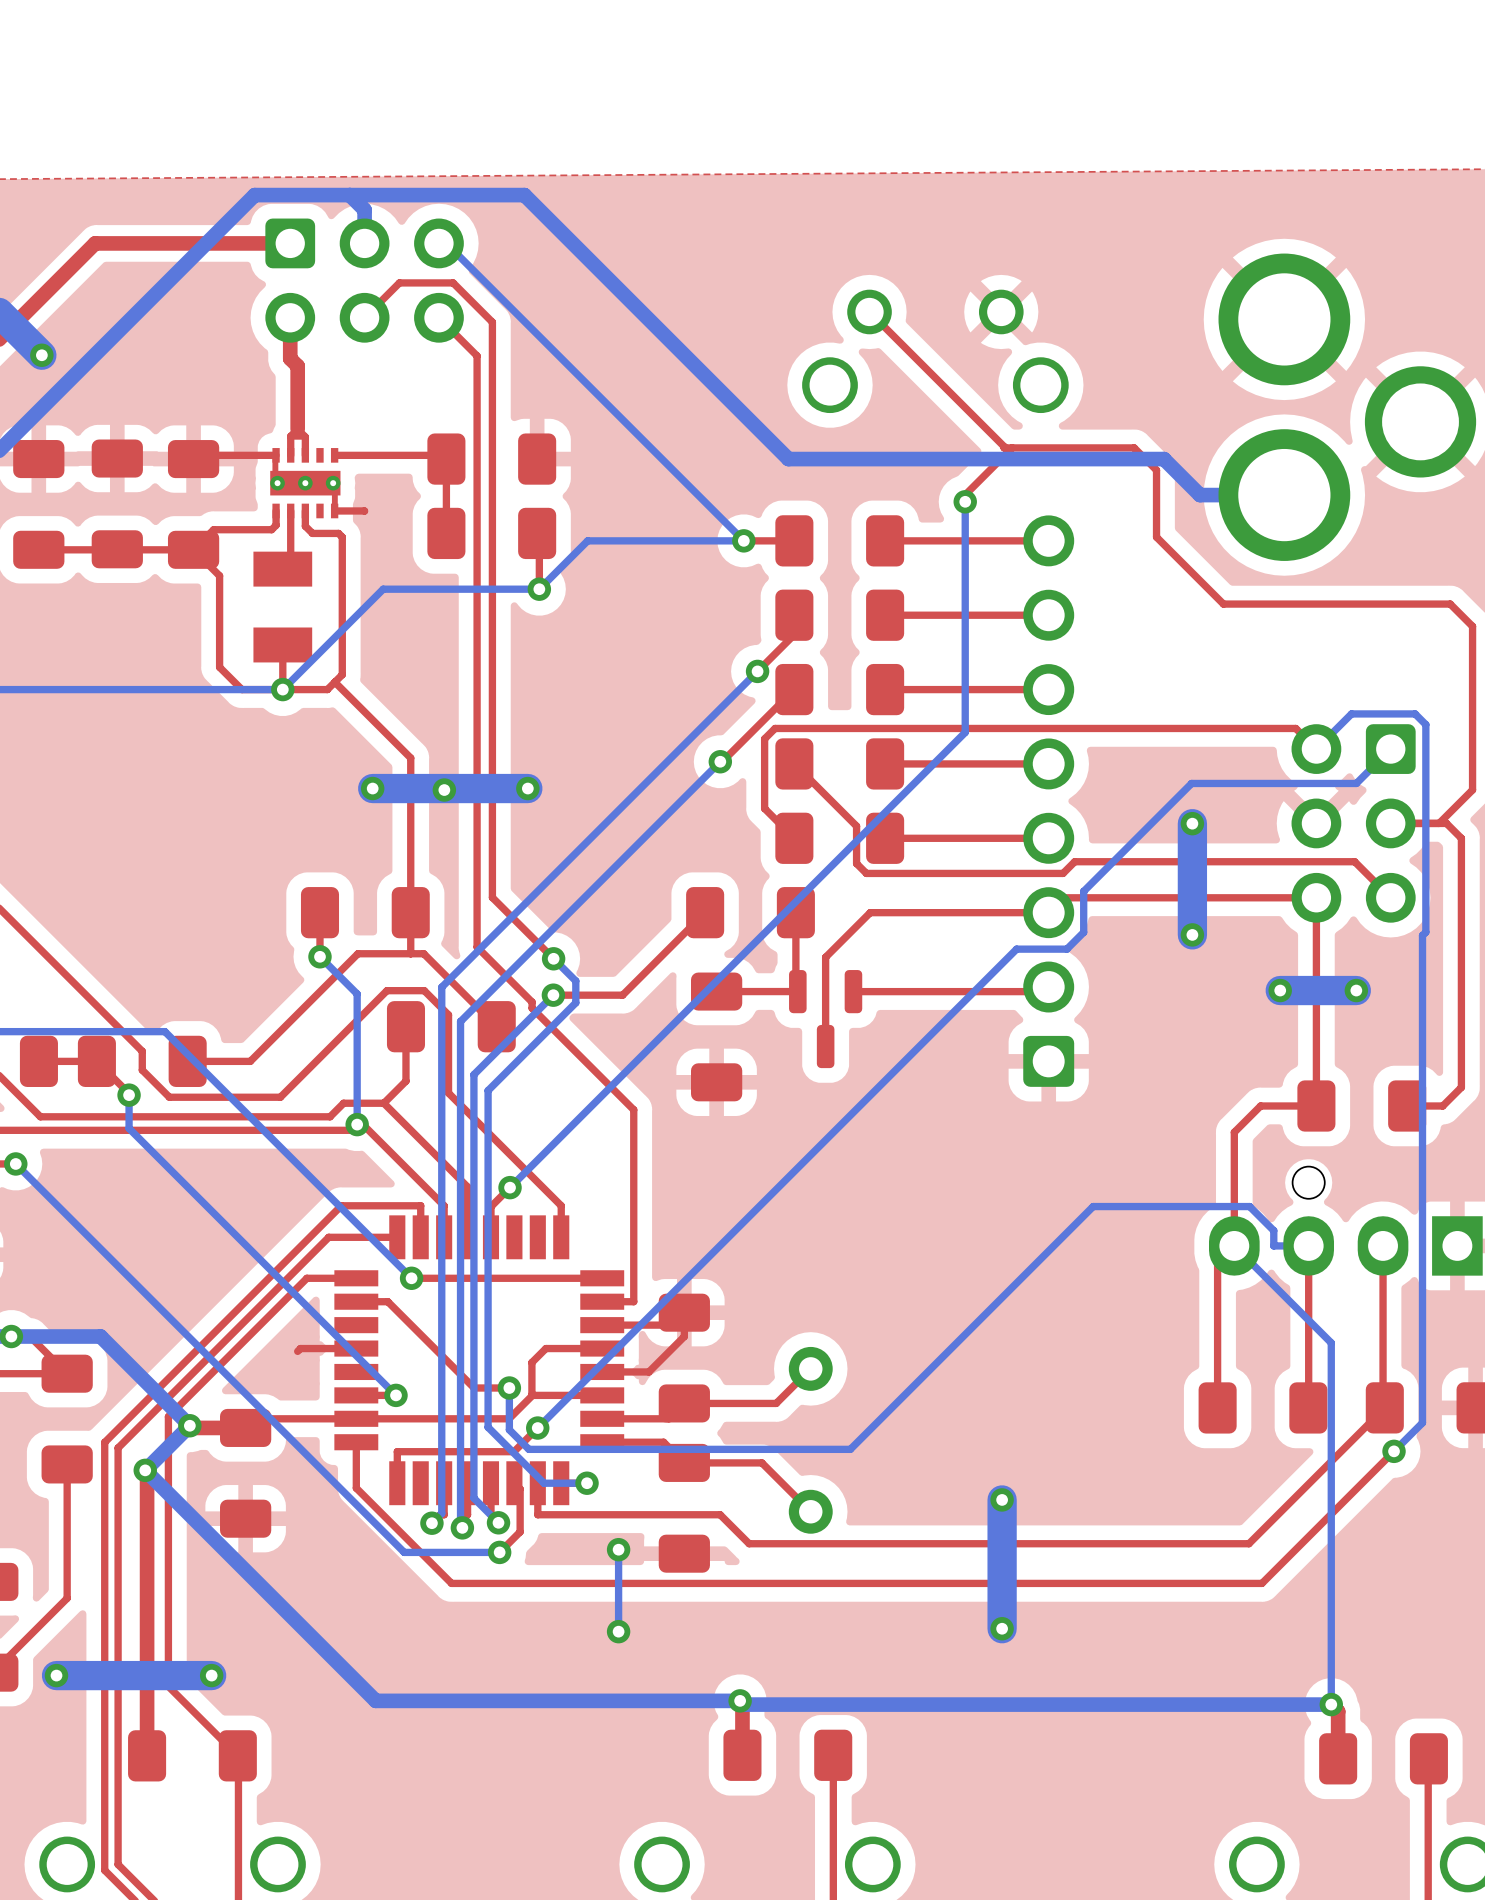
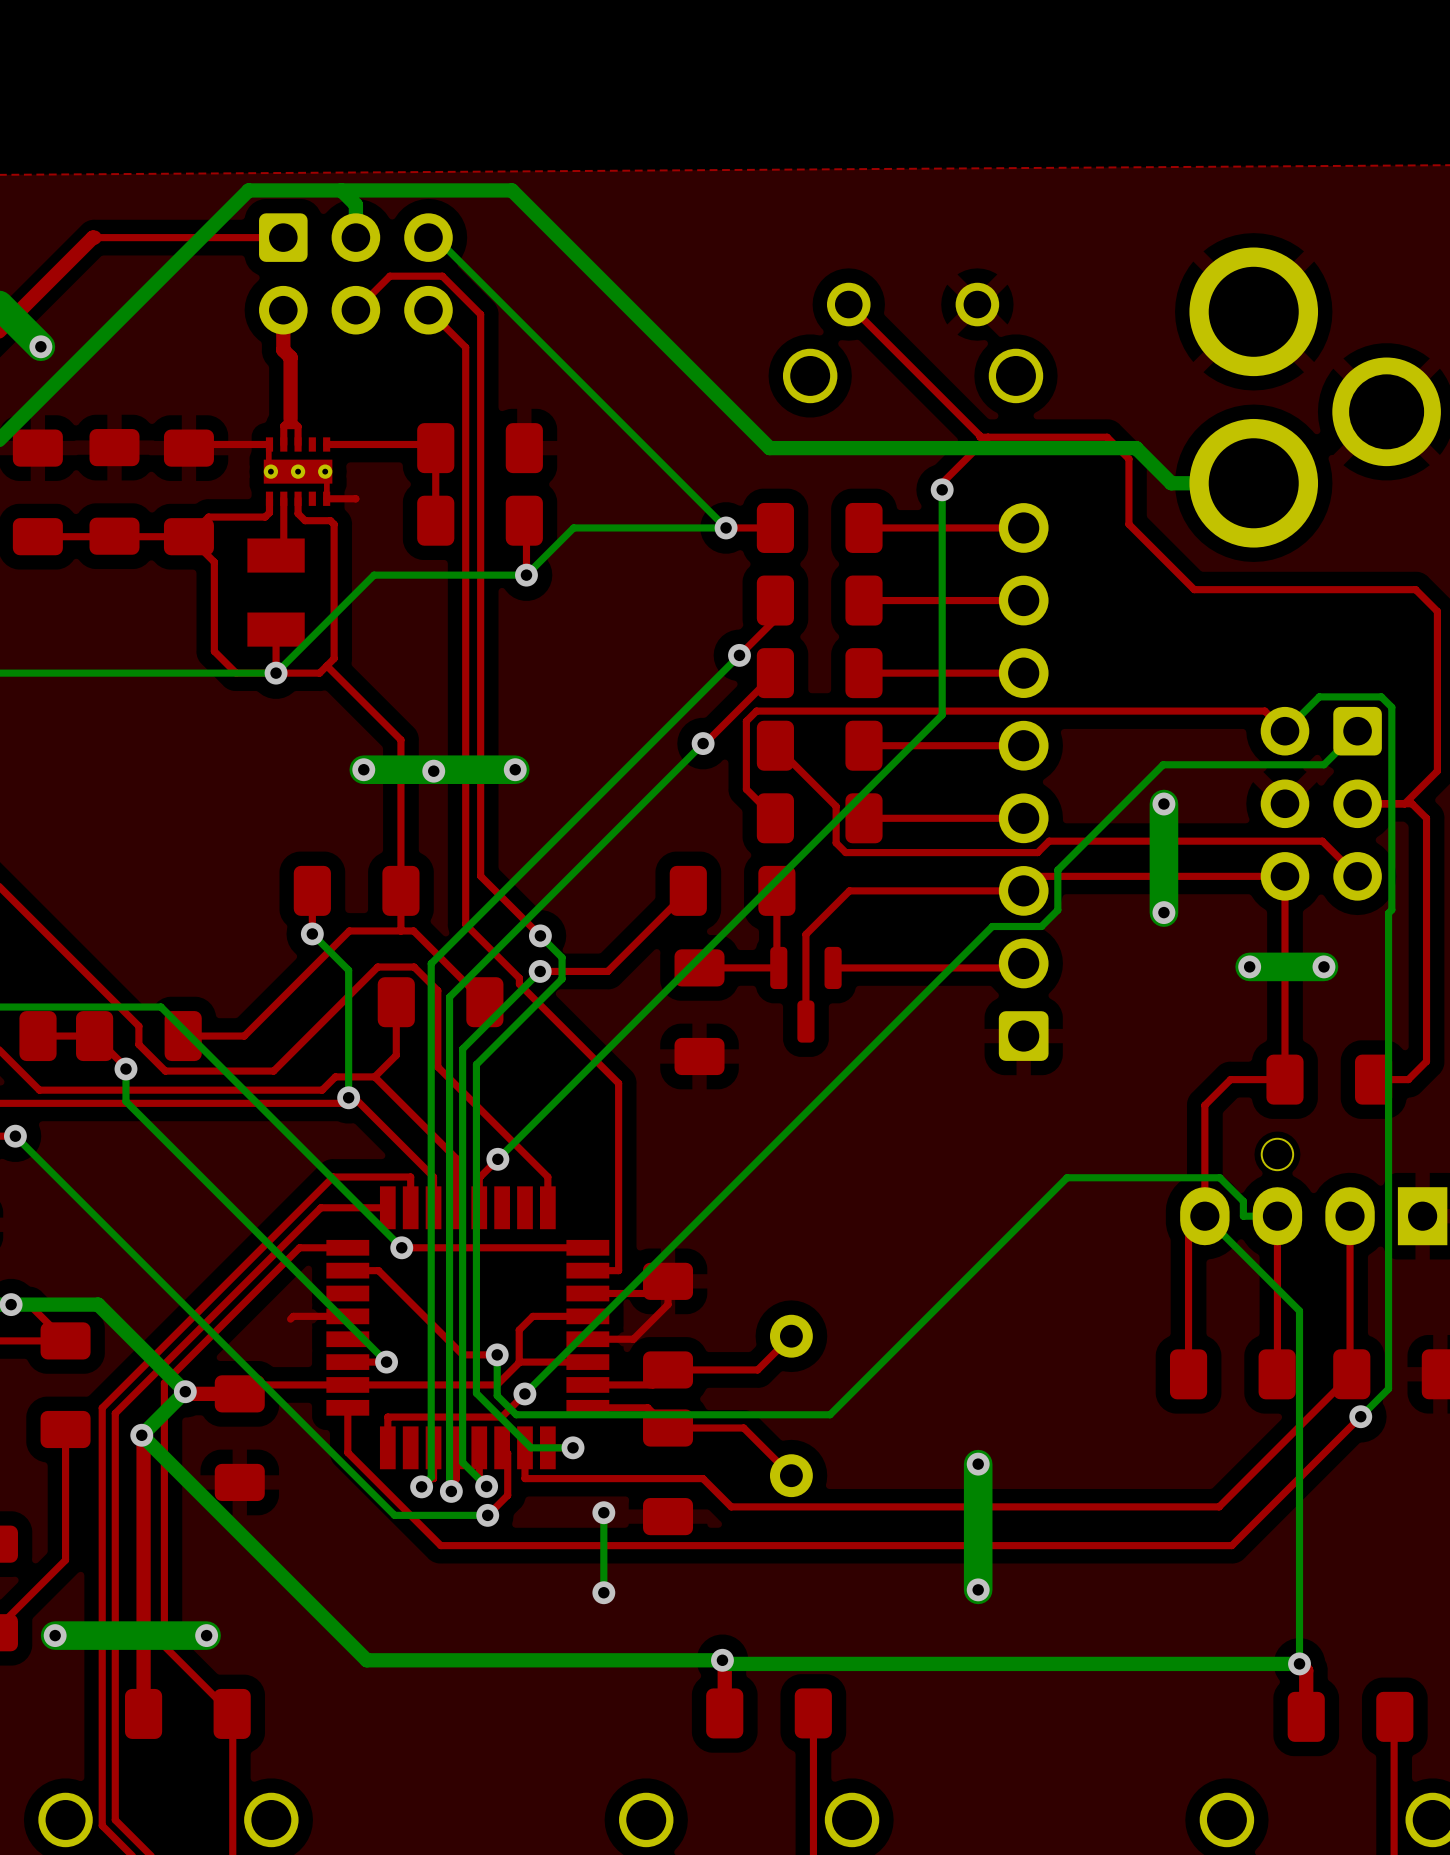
top track width: thick (290, 243) (96, 243) -> thin (283, 237) (94, 237)

